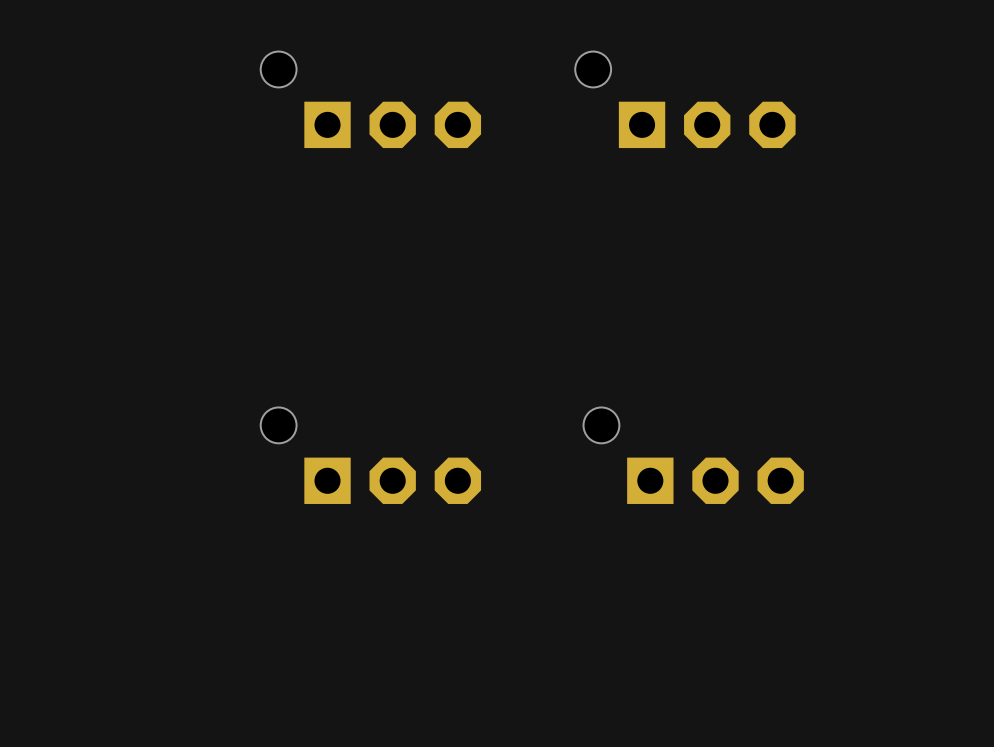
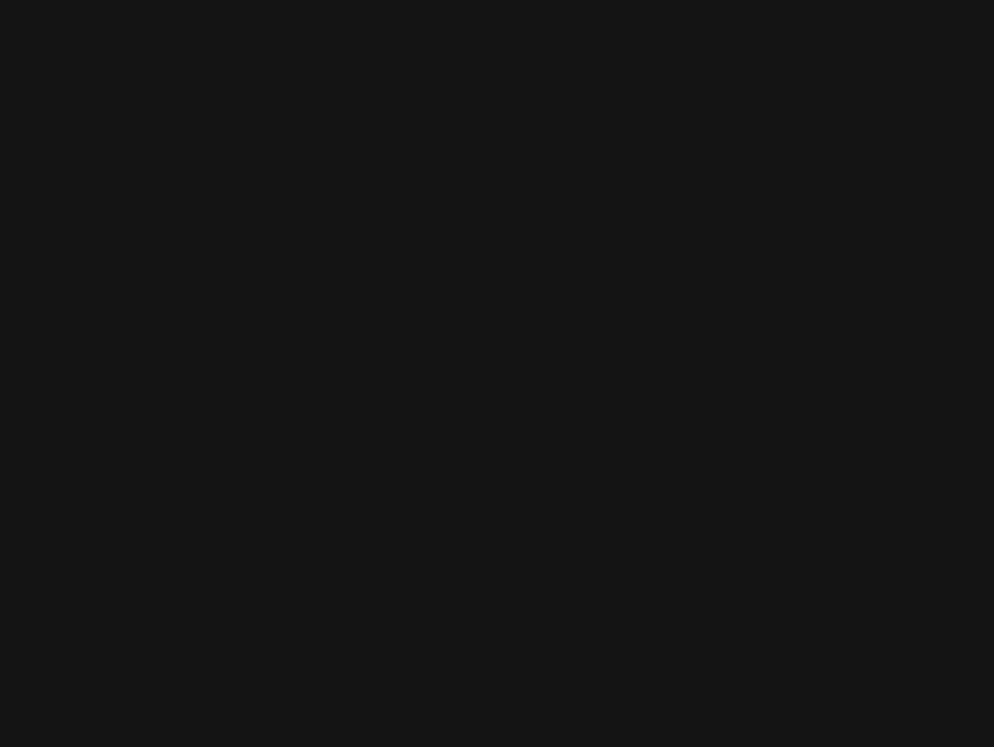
part: (370, 99) -> none
part: (685, 99) -> none
part: (370, 455) -> none
part: (693, 455) -> none

